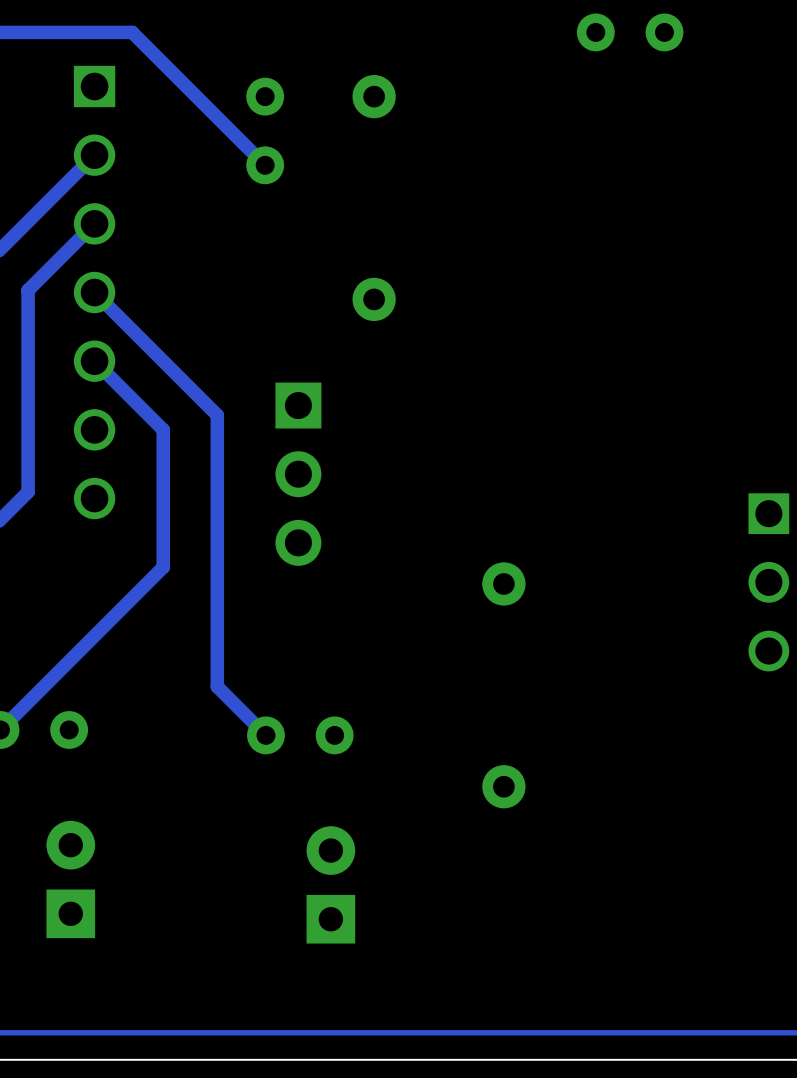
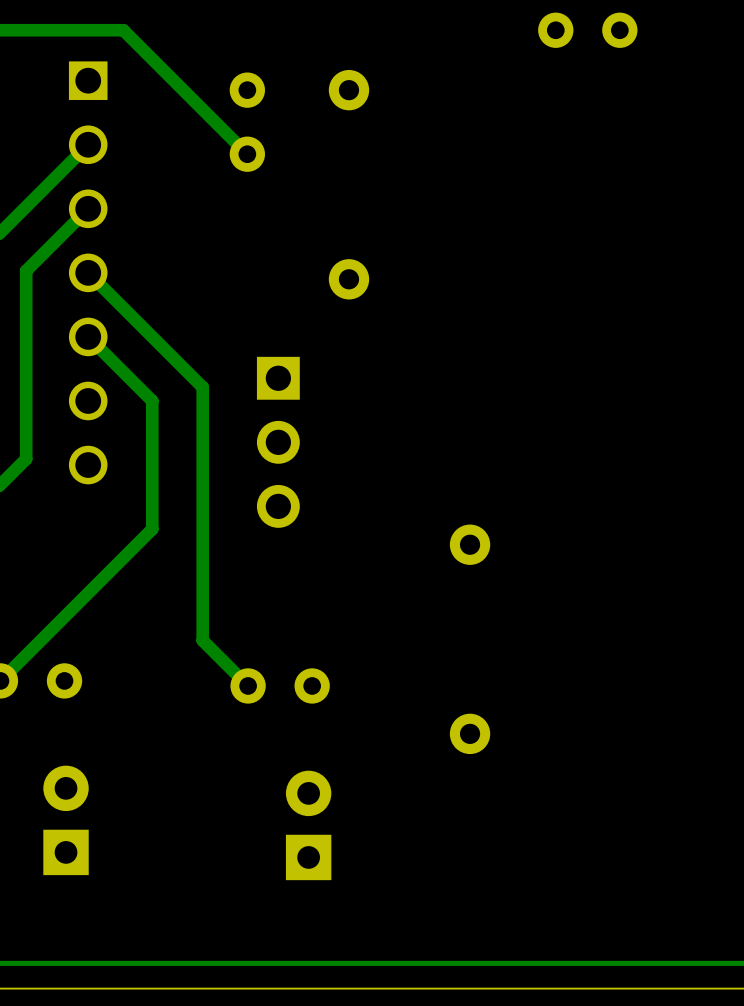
part: (768, 582) -> none

